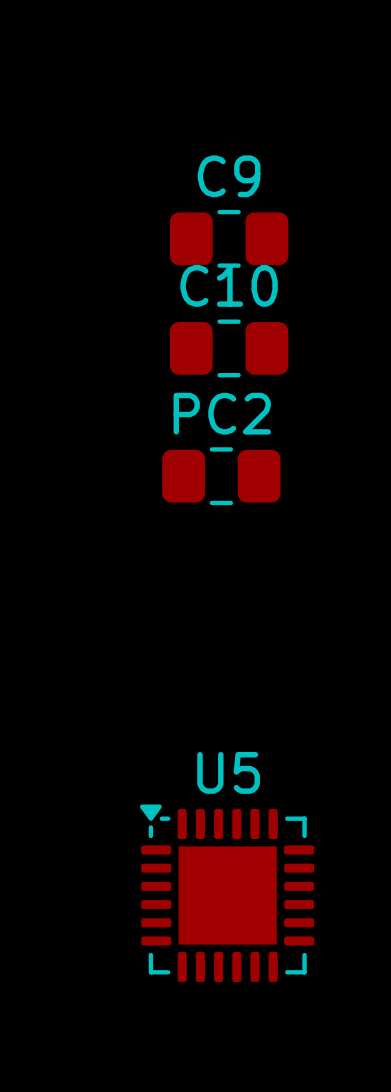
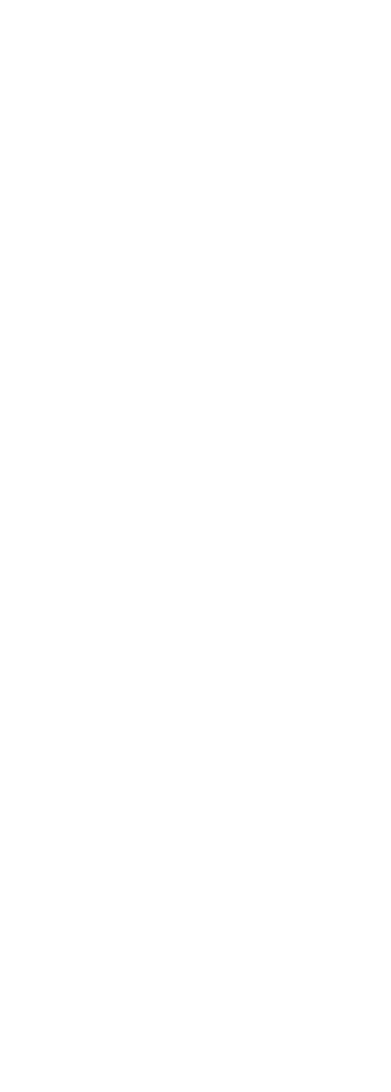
C9: (229, 238) -> none
C10: (229, 348) -> none
PC2: (221, 476) -> none
U5: (227, 893) -> none

